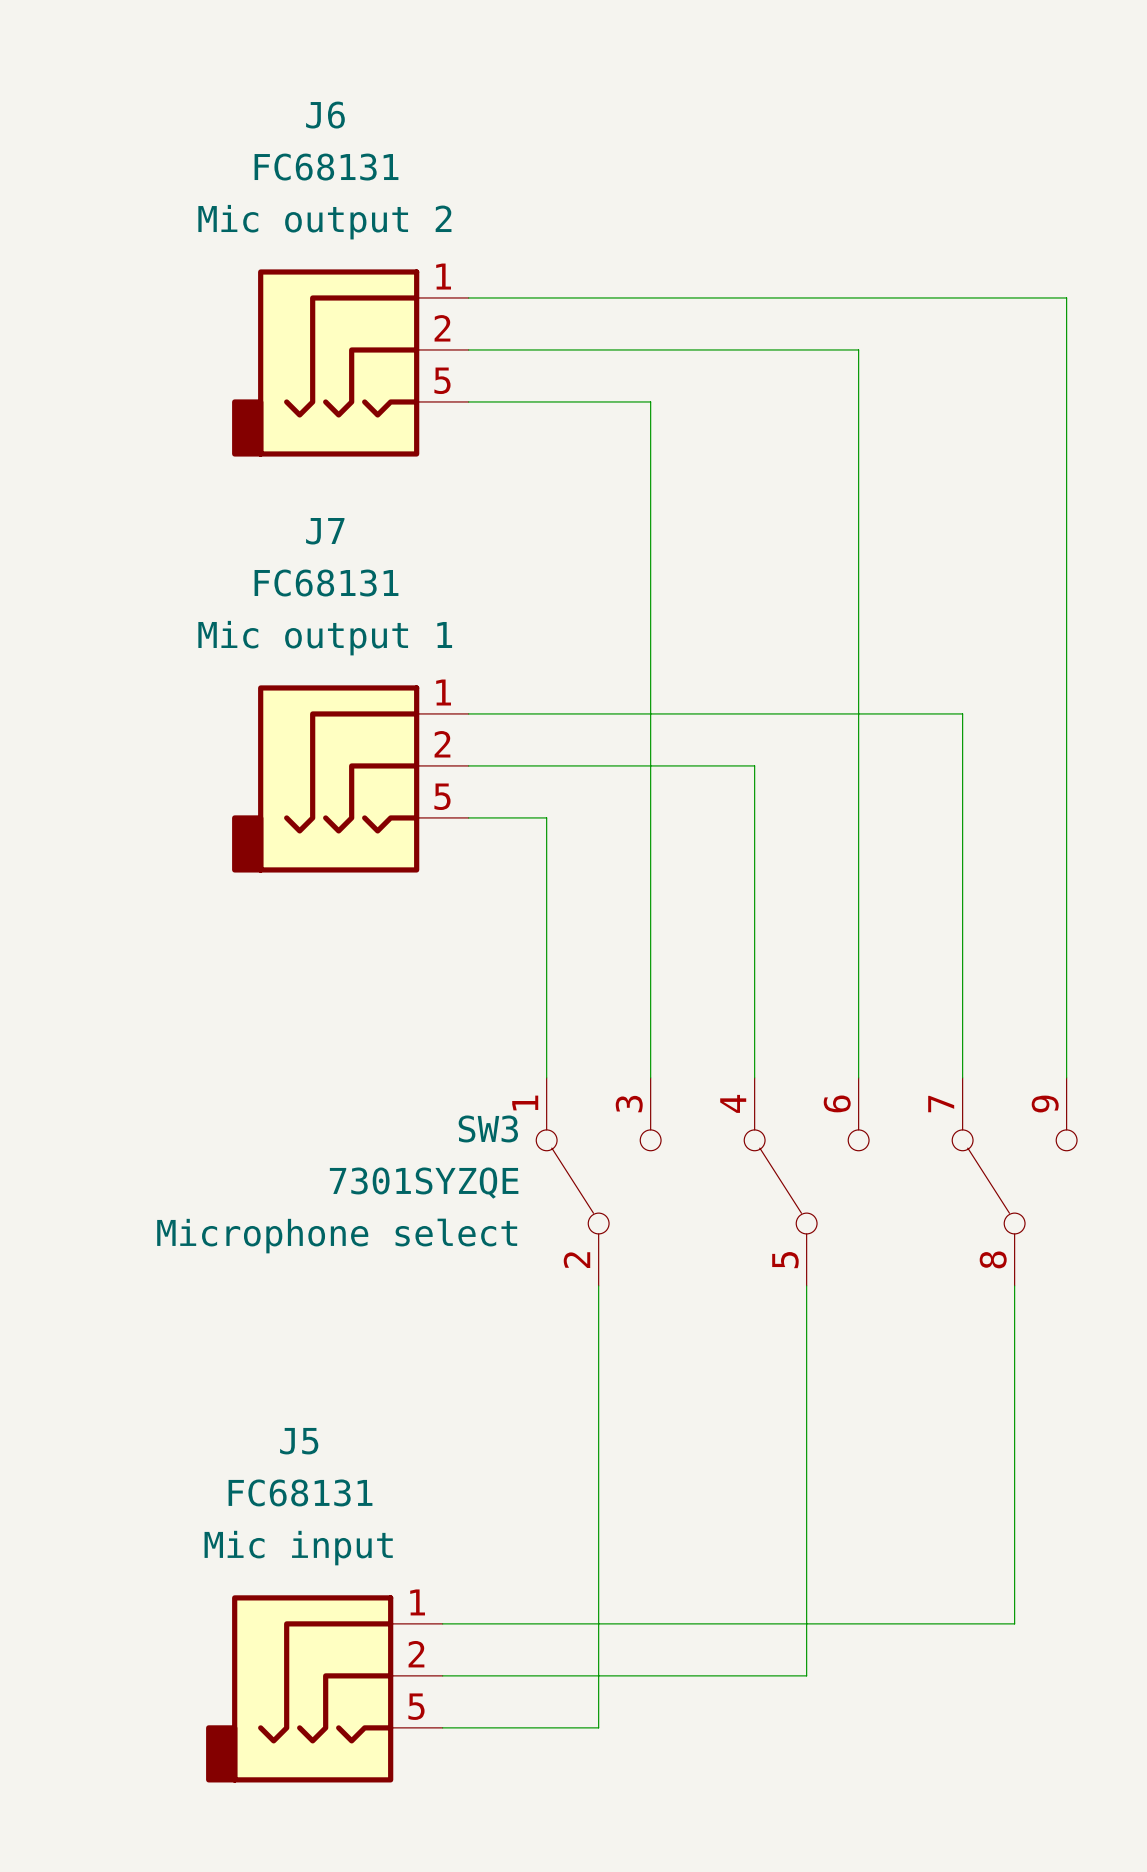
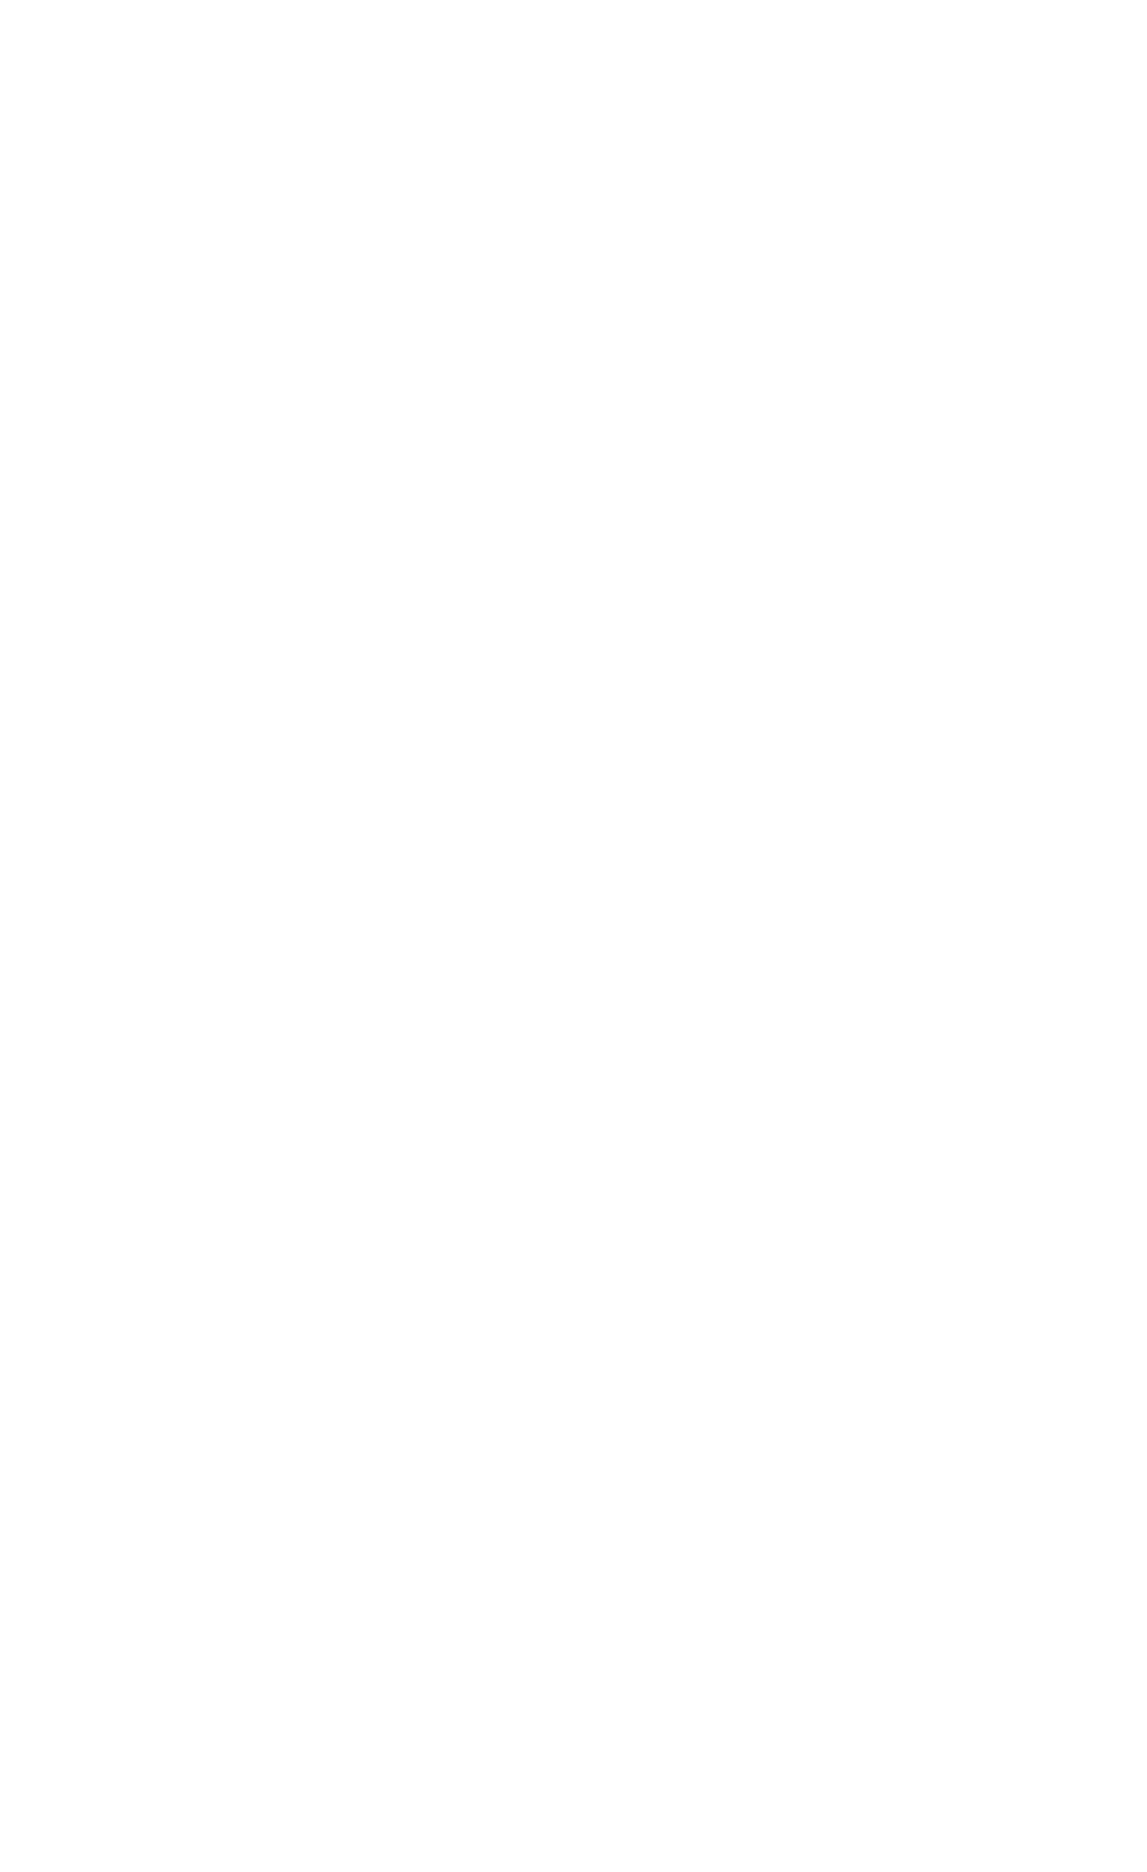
wire: (468, 297) (1066, 297) (1066, 1077) -> none
wire: (468, 349) (858, 349) (858, 1077) -> none
J6: FC68131 (350, 362) -> none
wire: (468, 401) (650, 401) (650, 1077) -> none
wire: (468, 713) (962, 713) (962, 1077) -> none
wire: (468, 765) (754, 765) (754, 1077) -> none
J7: FC68131 (350, 778) -> none
wire: (468, 817) (546, 817) (546, 1077) -> none
SW3: 7301SYZQE (806, 1181) -> none
wire: (598, 1285) (598, 1727) (442, 1727) -> none
wire: (806, 1285) (806, 1675) (442, 1675) -> none
wire: (1014, 1285) (1014, 1623) (442, 1623) -> none
J5: FC68131 (324, 1688) -> none

